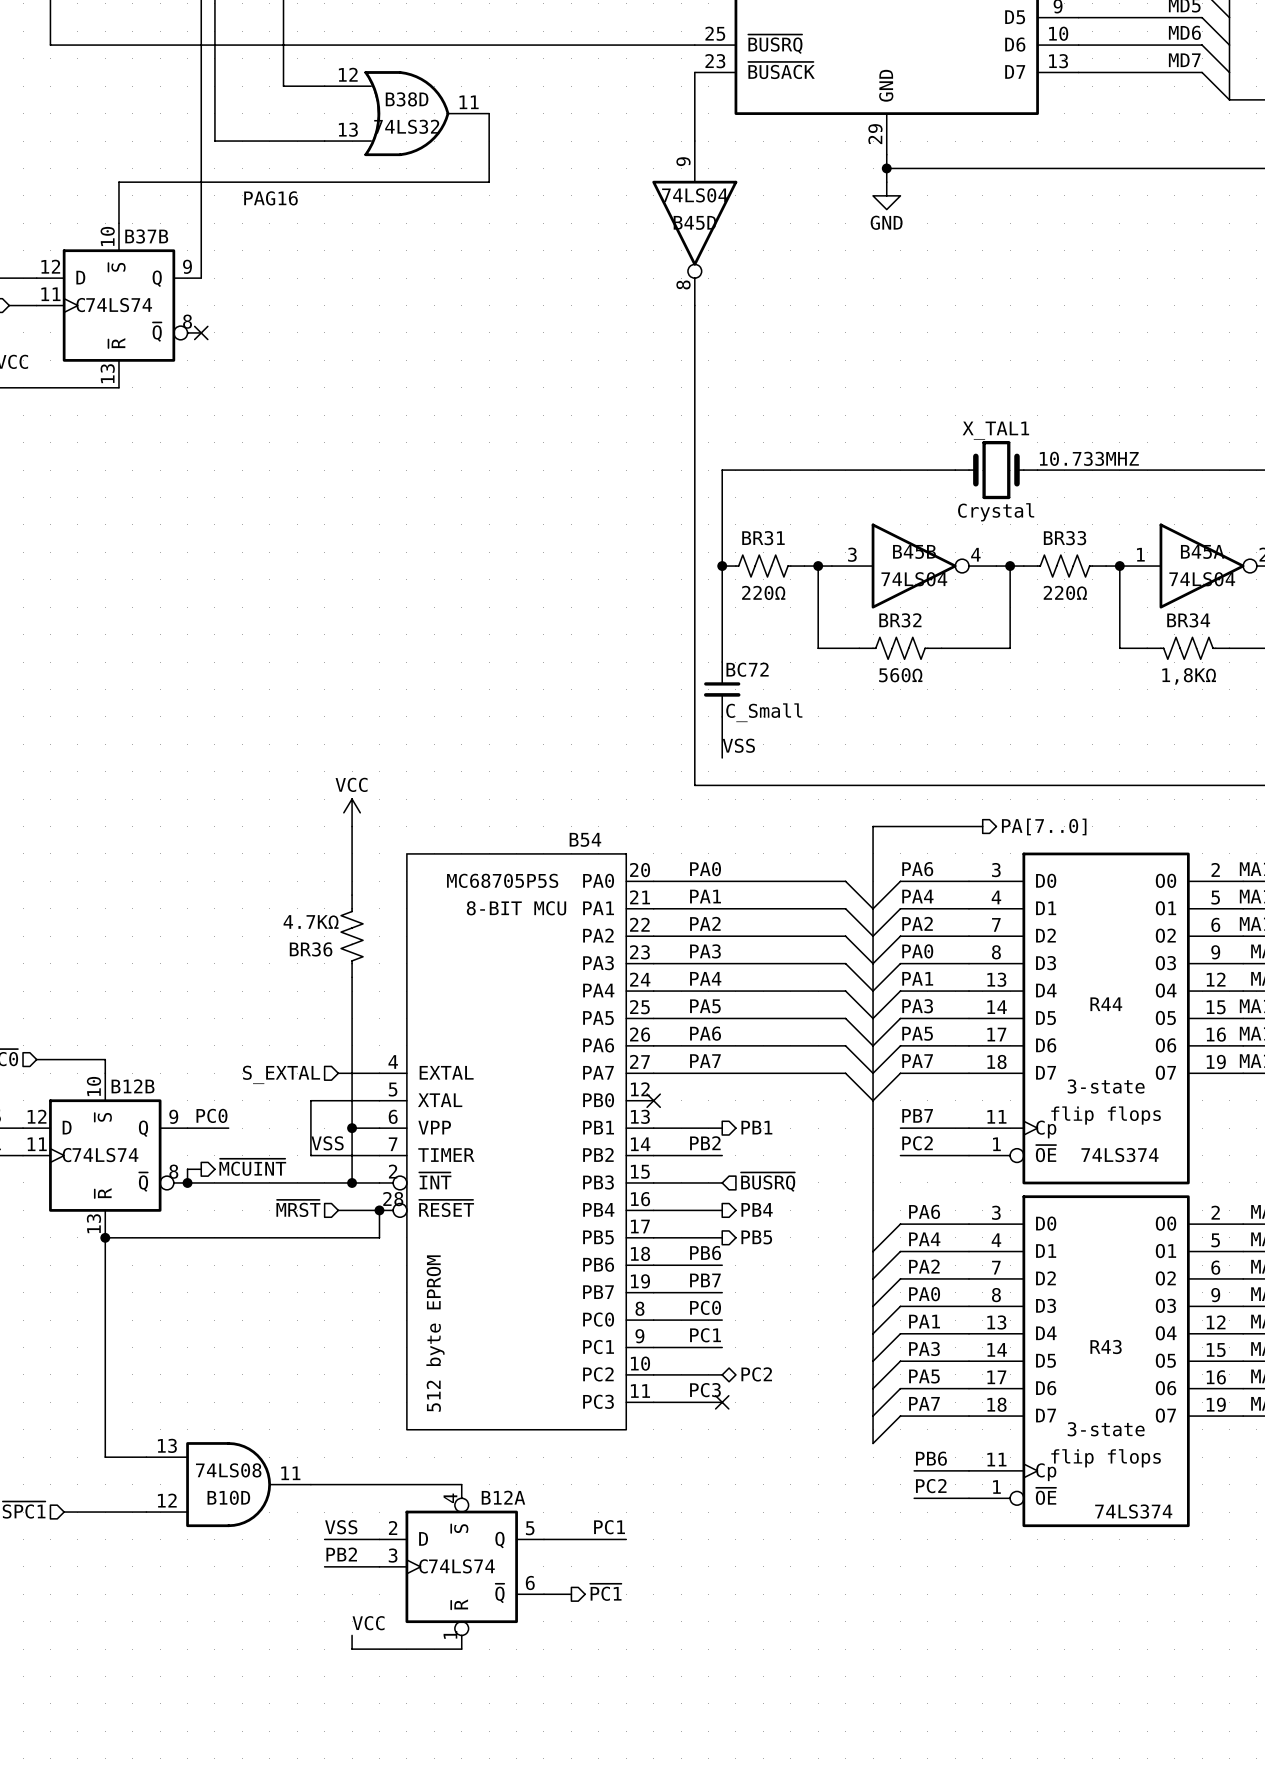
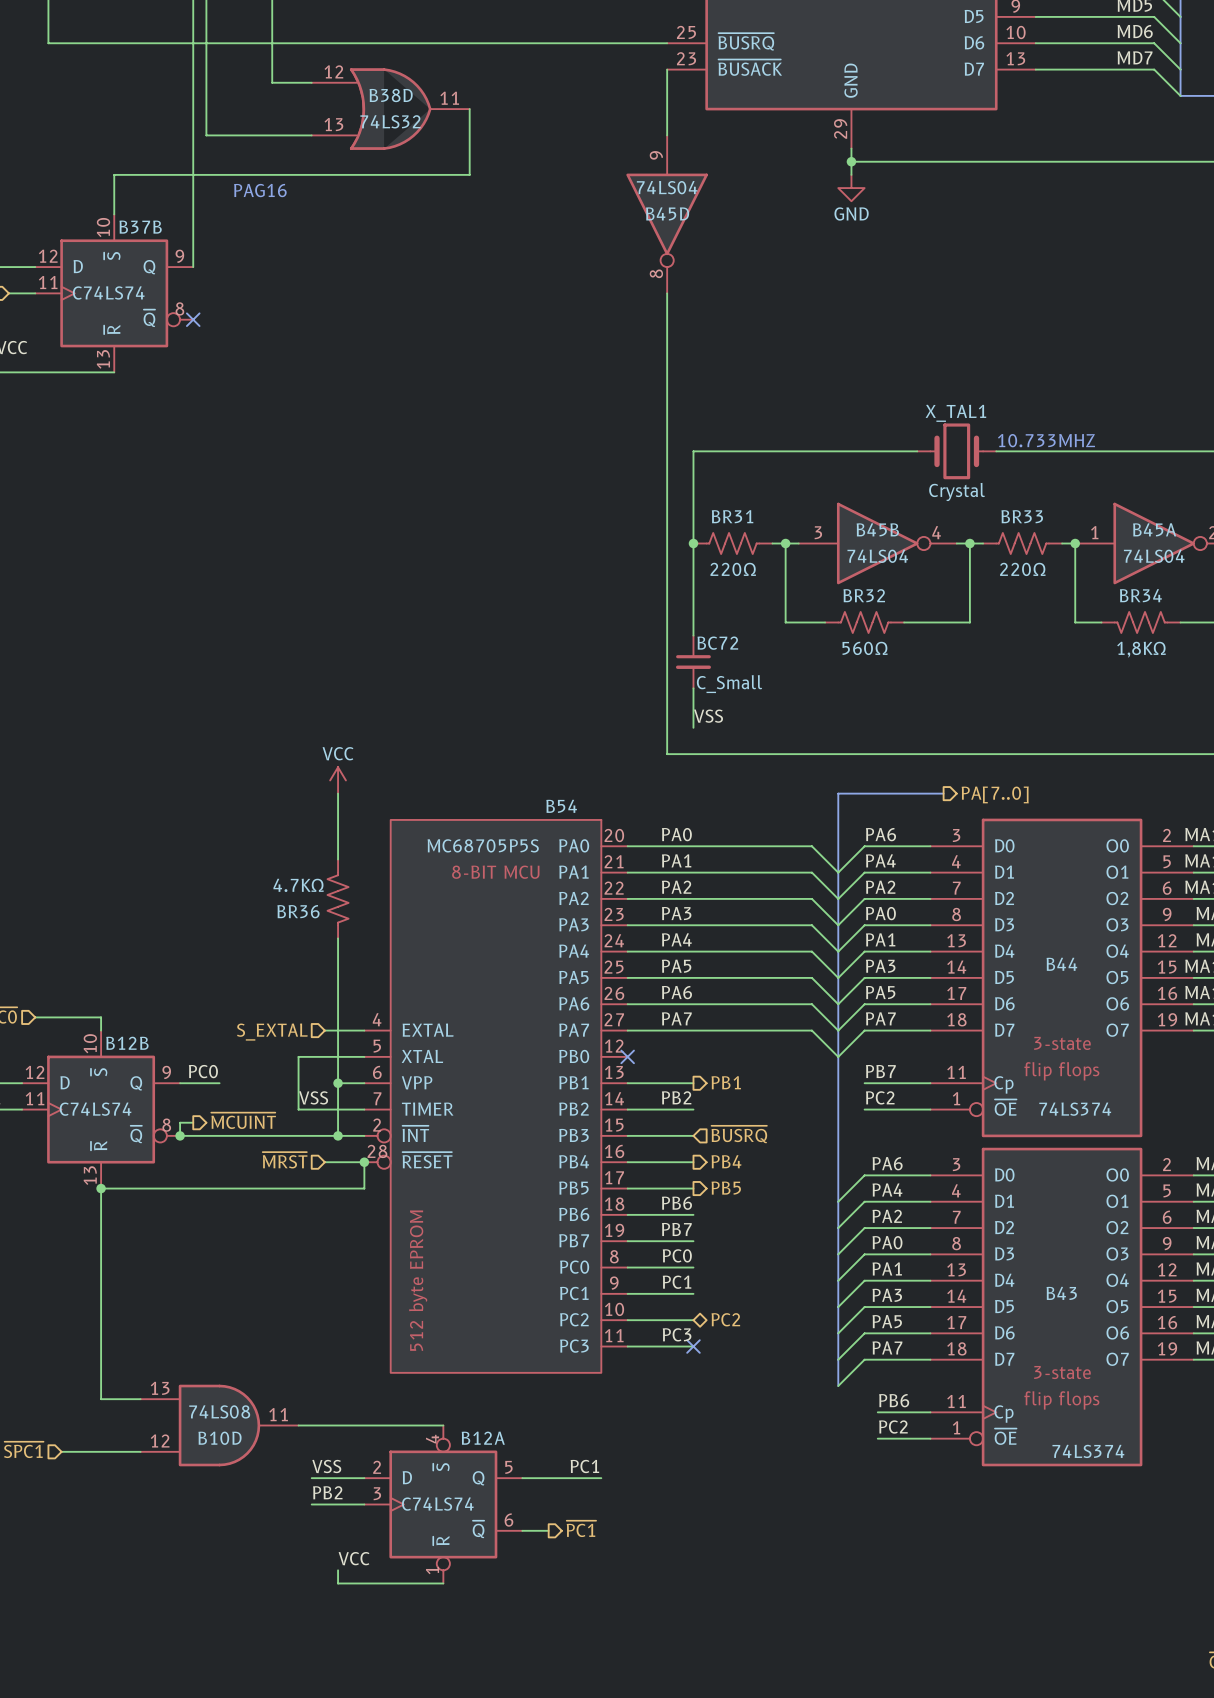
R44 name: R44 (1106, 1004) -> B44 (1061, 964)
R43 name: R43 (1106, 1347) -> B43 (1061, 1293)

